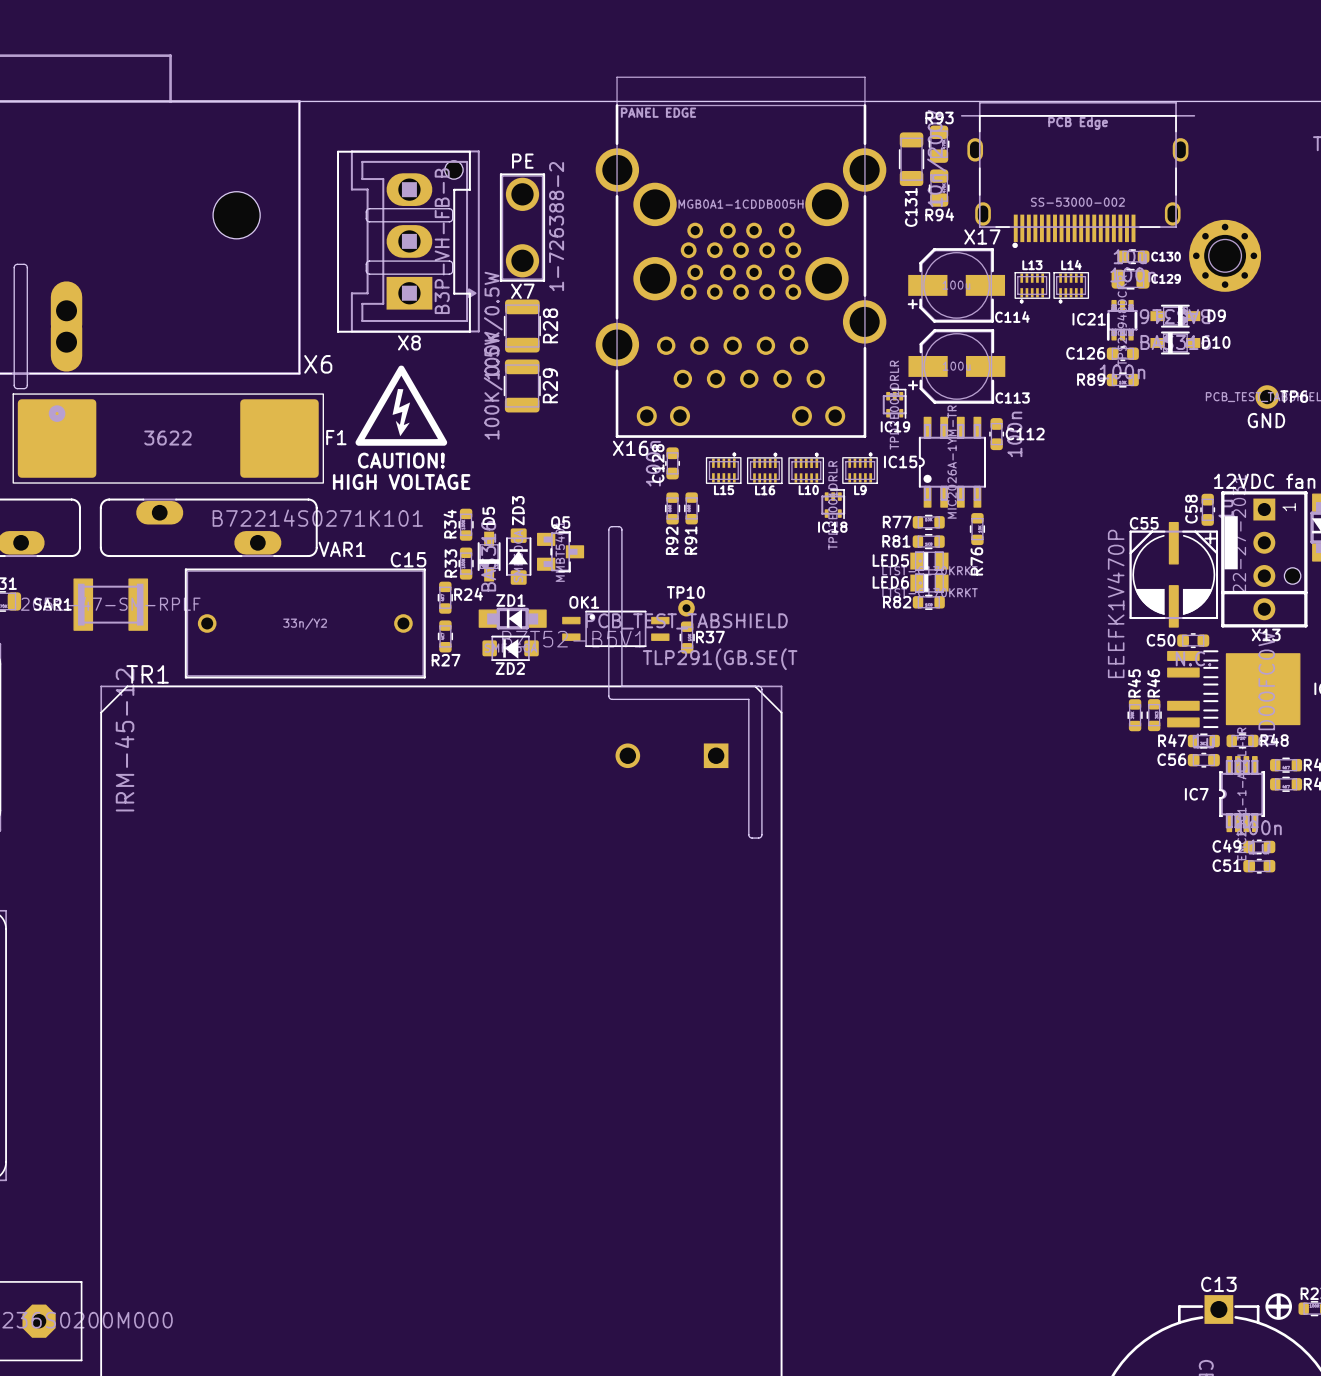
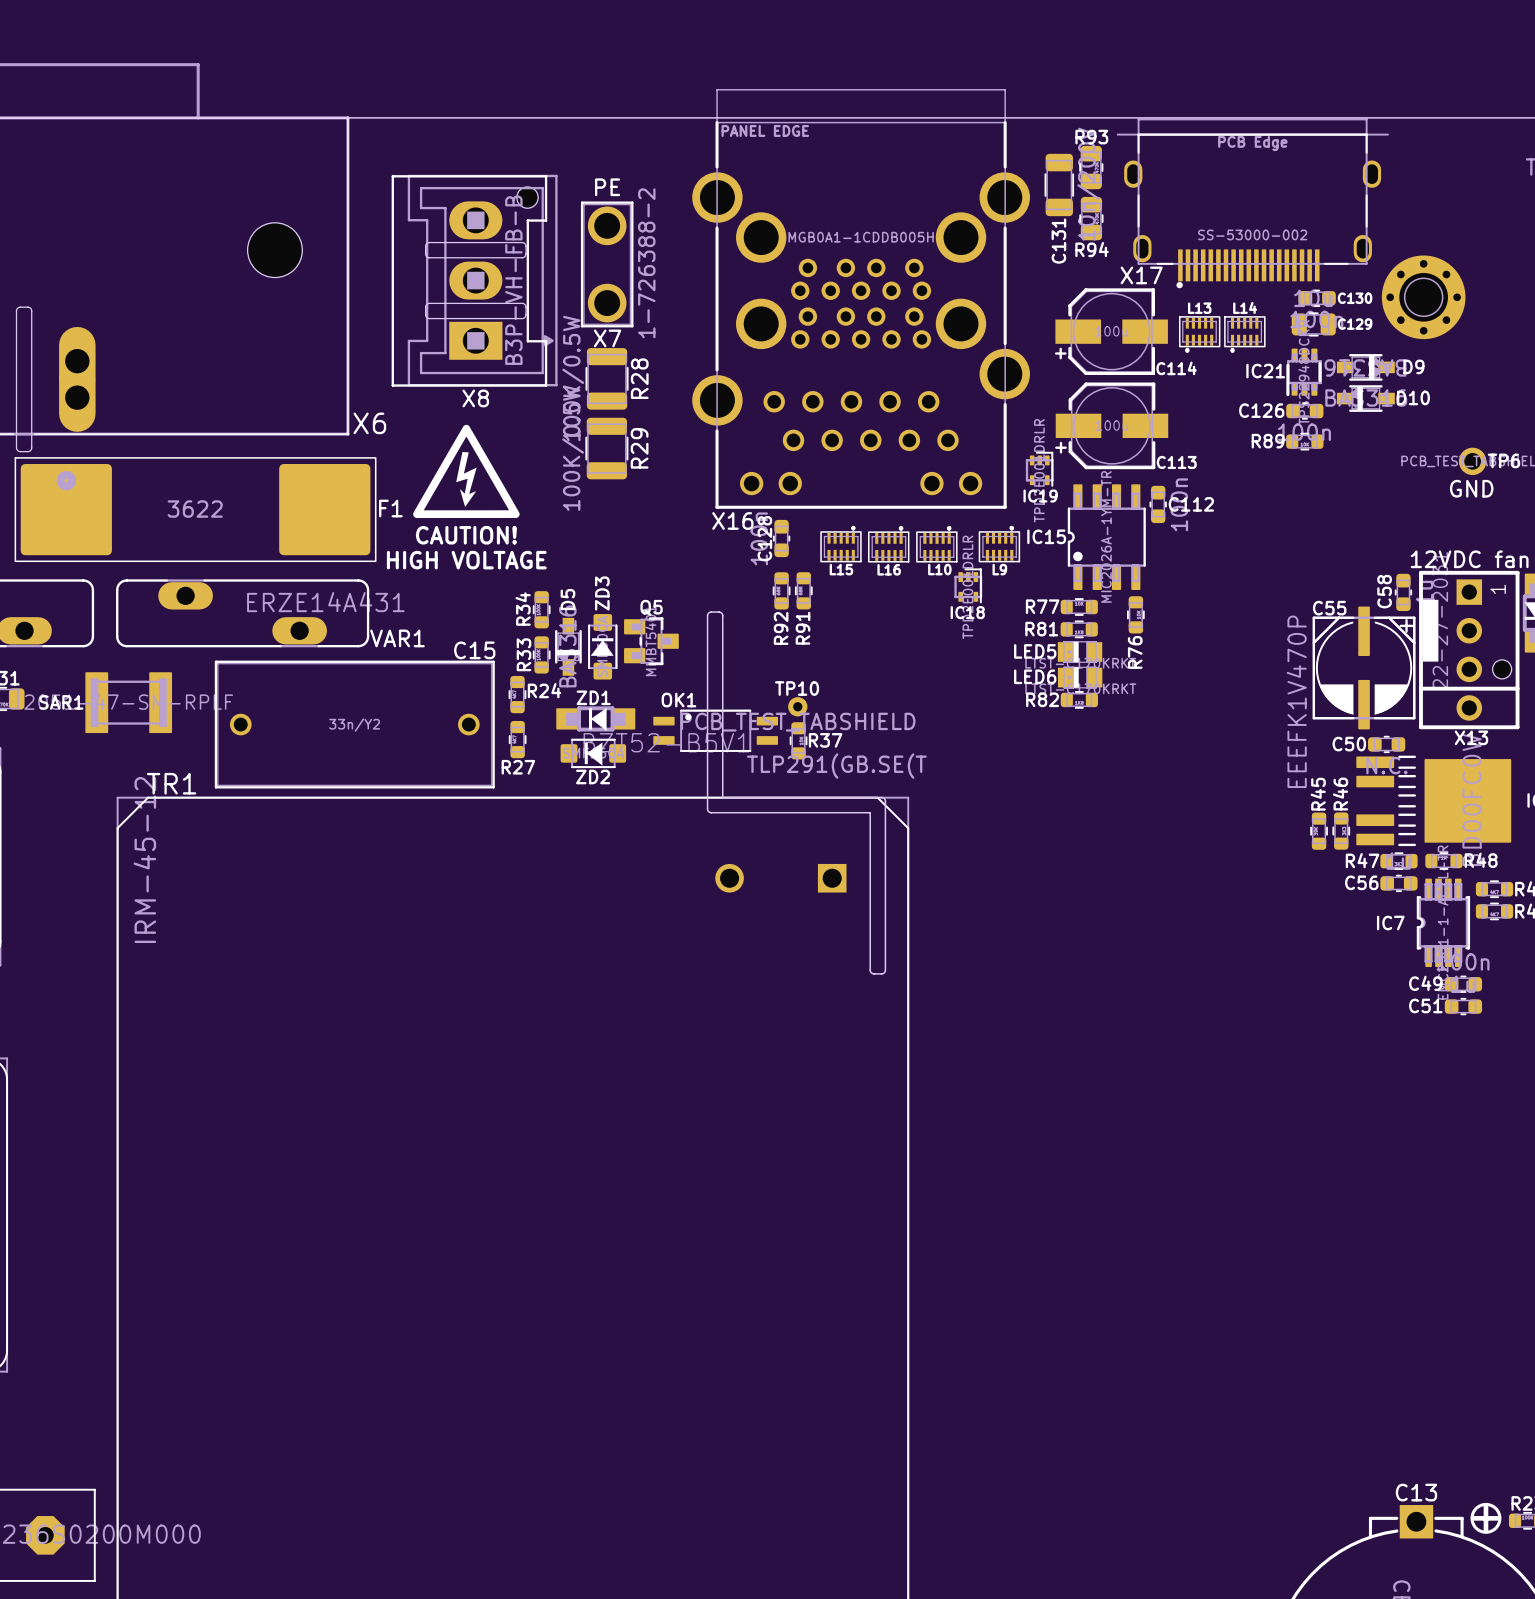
VAR1 value: B72214S0271K101 (317, 518) -> ERZE14A431 (325, 602)

